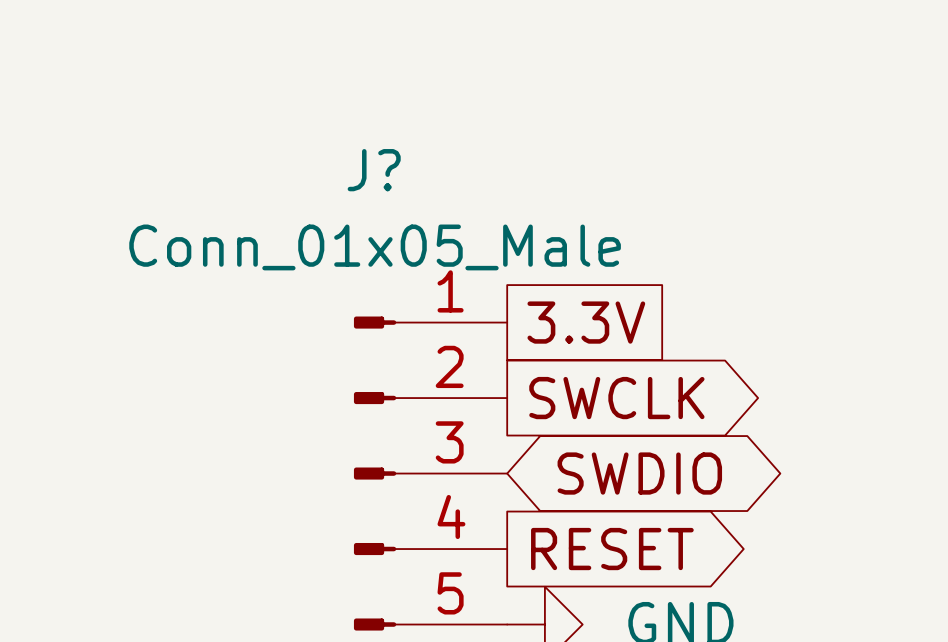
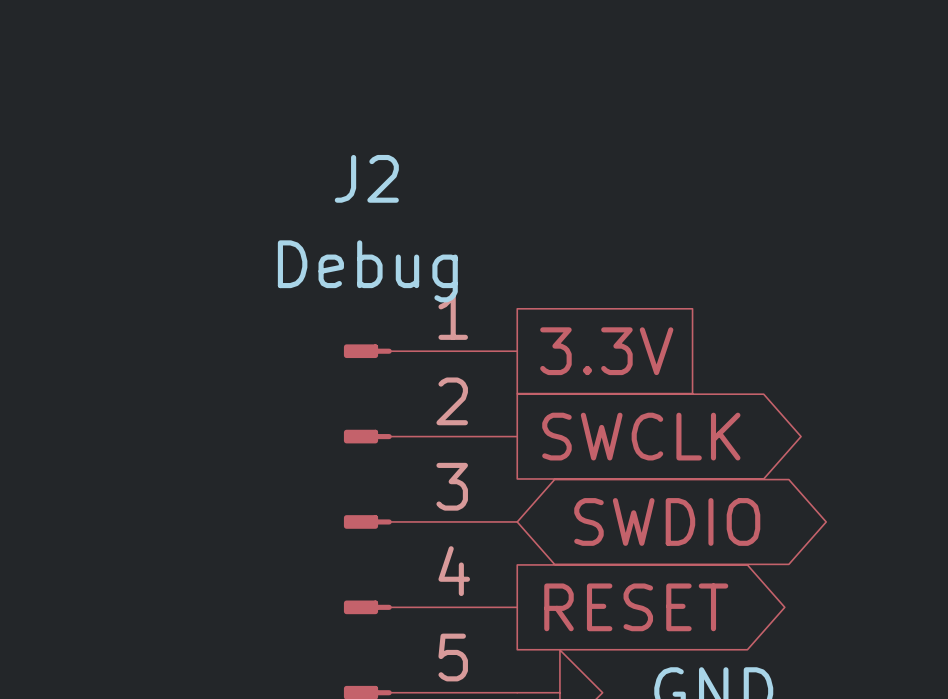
J? name: J? (374, 170) -> J2 (366, 178)
J? value: Conn_01x05_Male (375, 247) -> Debug (367, 271)

